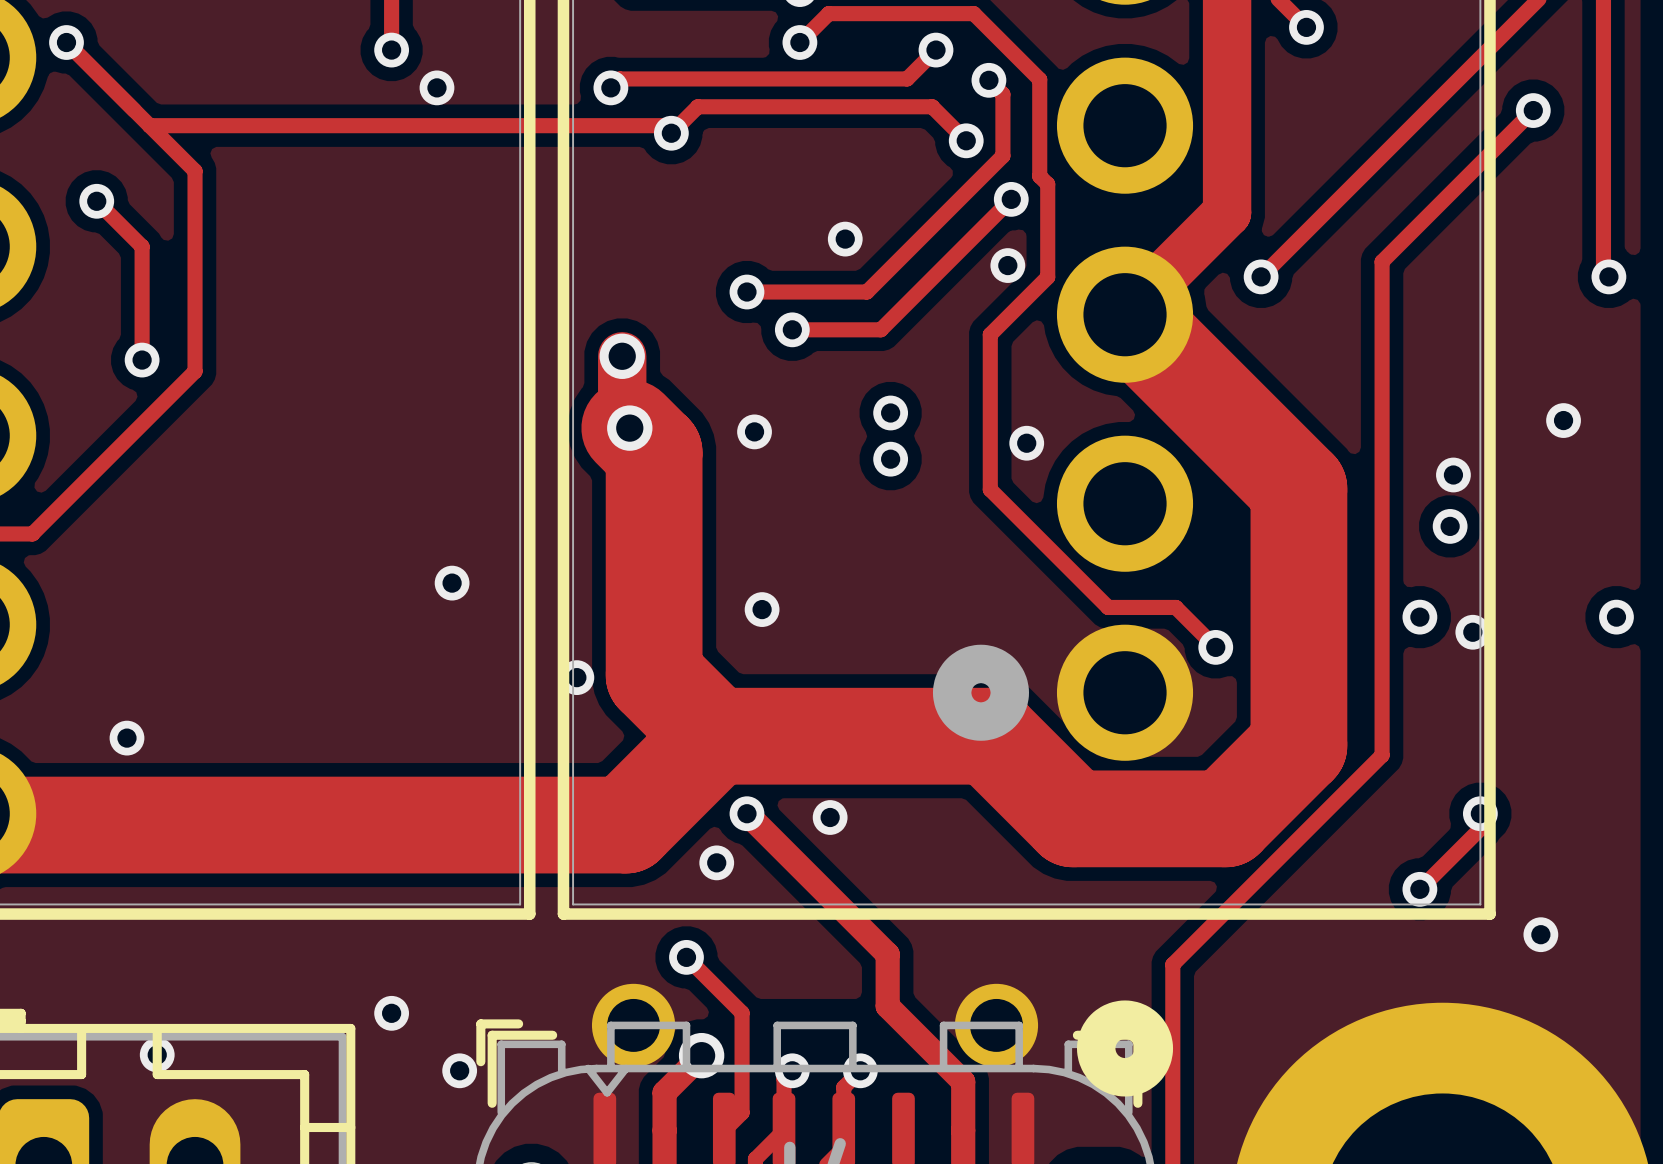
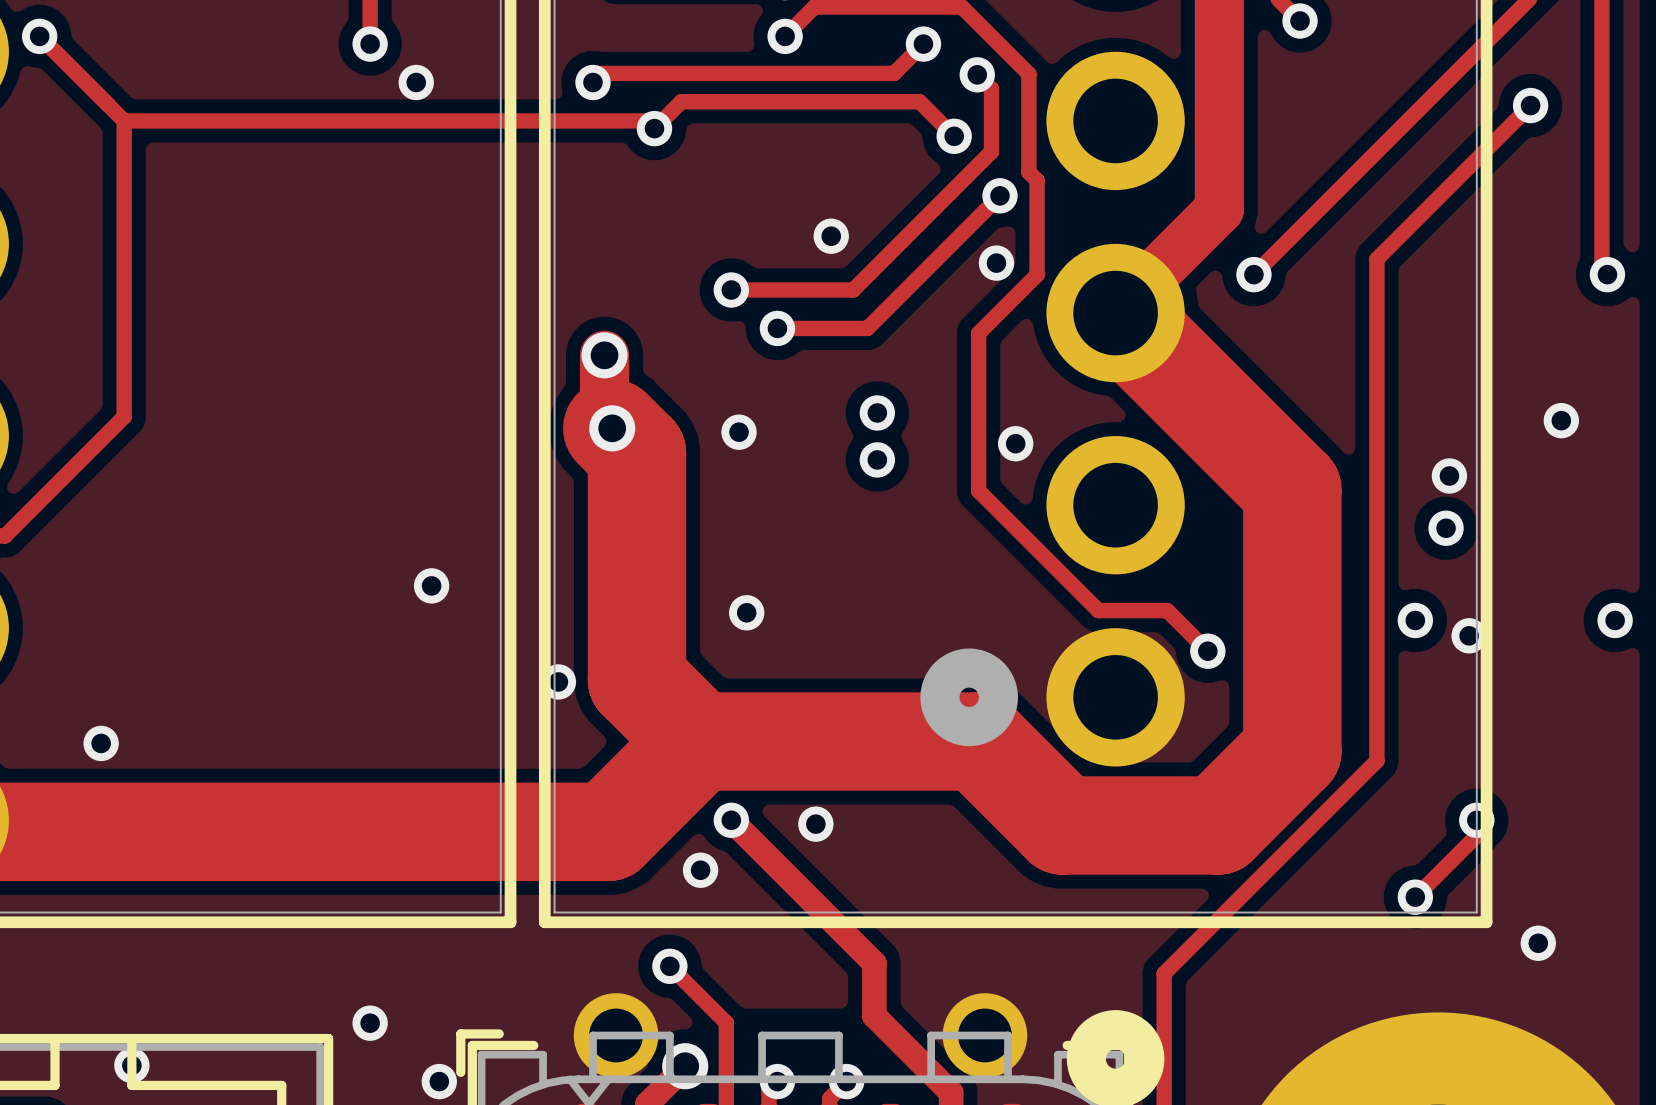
track: (149, 125) (195, 171) (195, 371) (149, 416) -> (124, 120) (124, 416)
track: (96, 201) (142, 246) (142, 360) -> none
via: (96, 201) -> none
via: (142, 360) -> none

